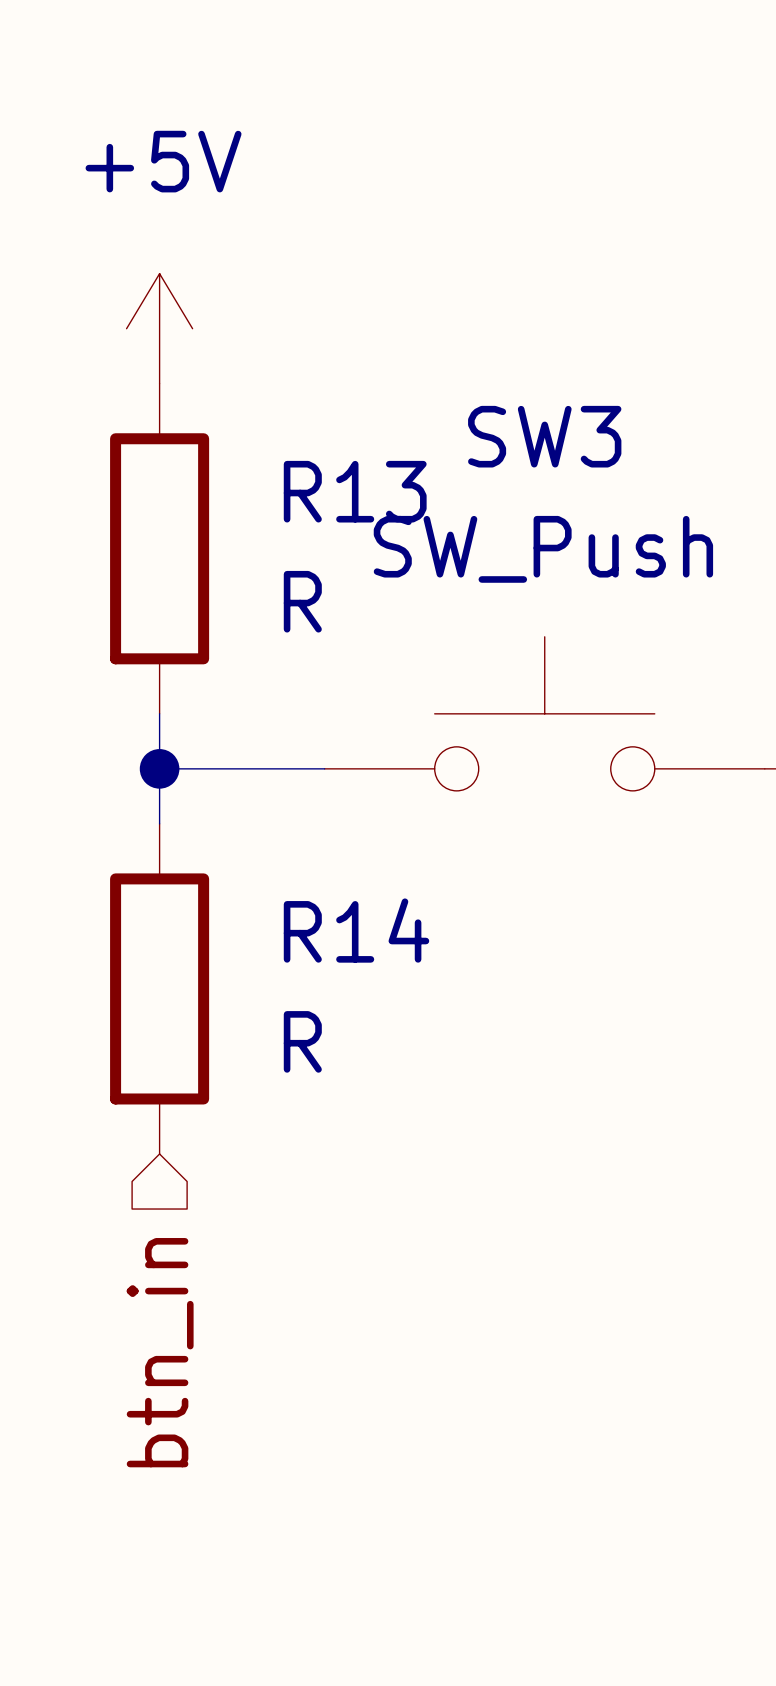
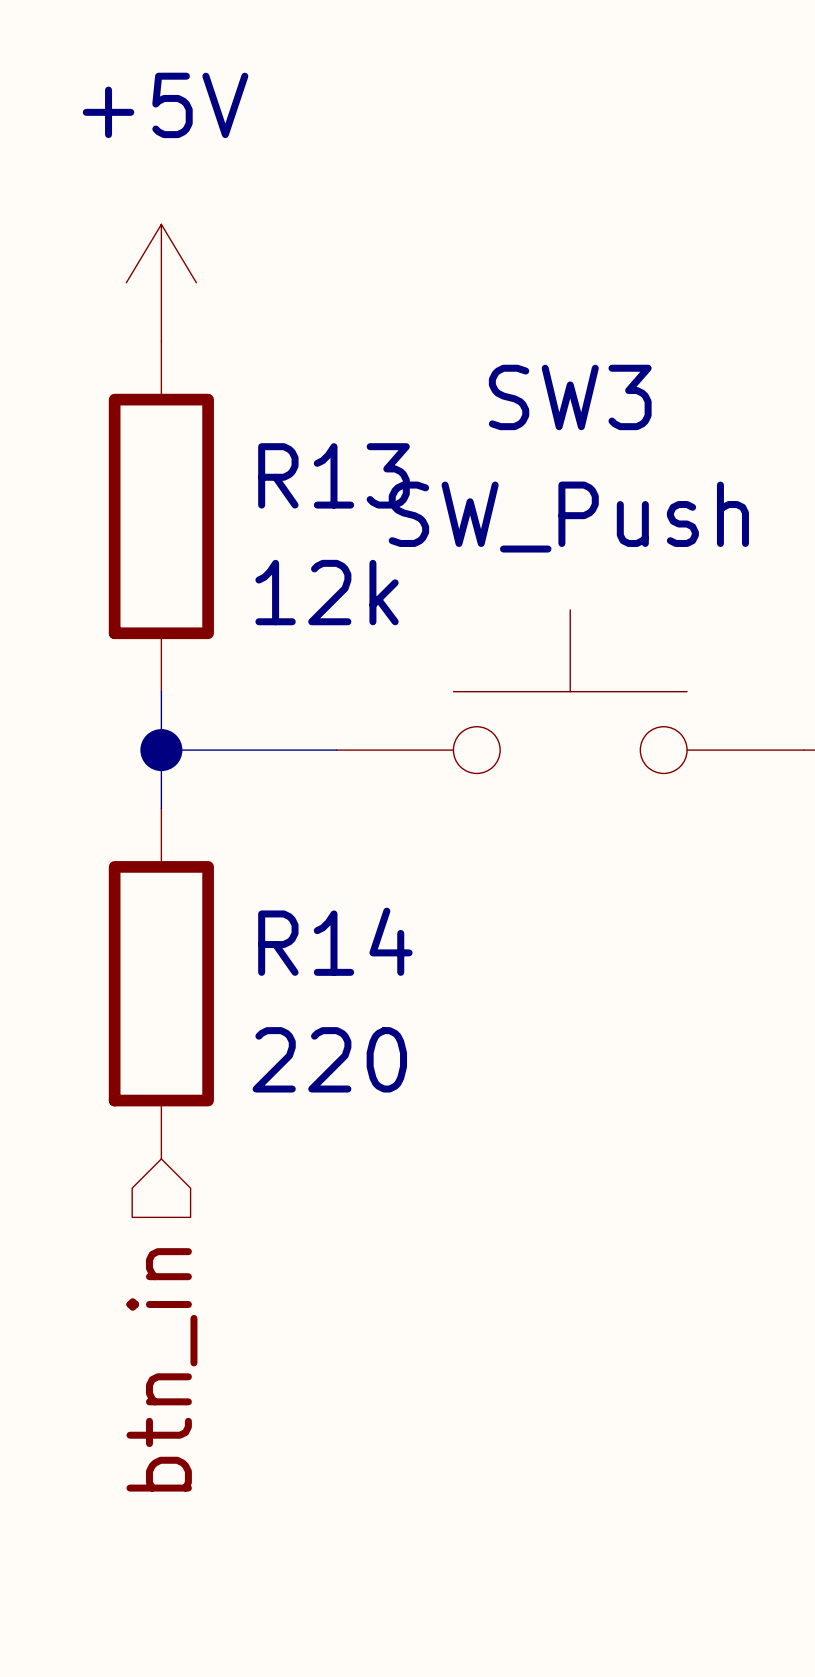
R13 name position: R13 (355, 491) -> R13 (333, 475)
R13 value: R (302, 601) -> 12k (327, 592)
R14 name position: R14 (356, 930) -> R14 (335, 941)
R14 value: R (302, 1041) -> 220 (329, 1059)

